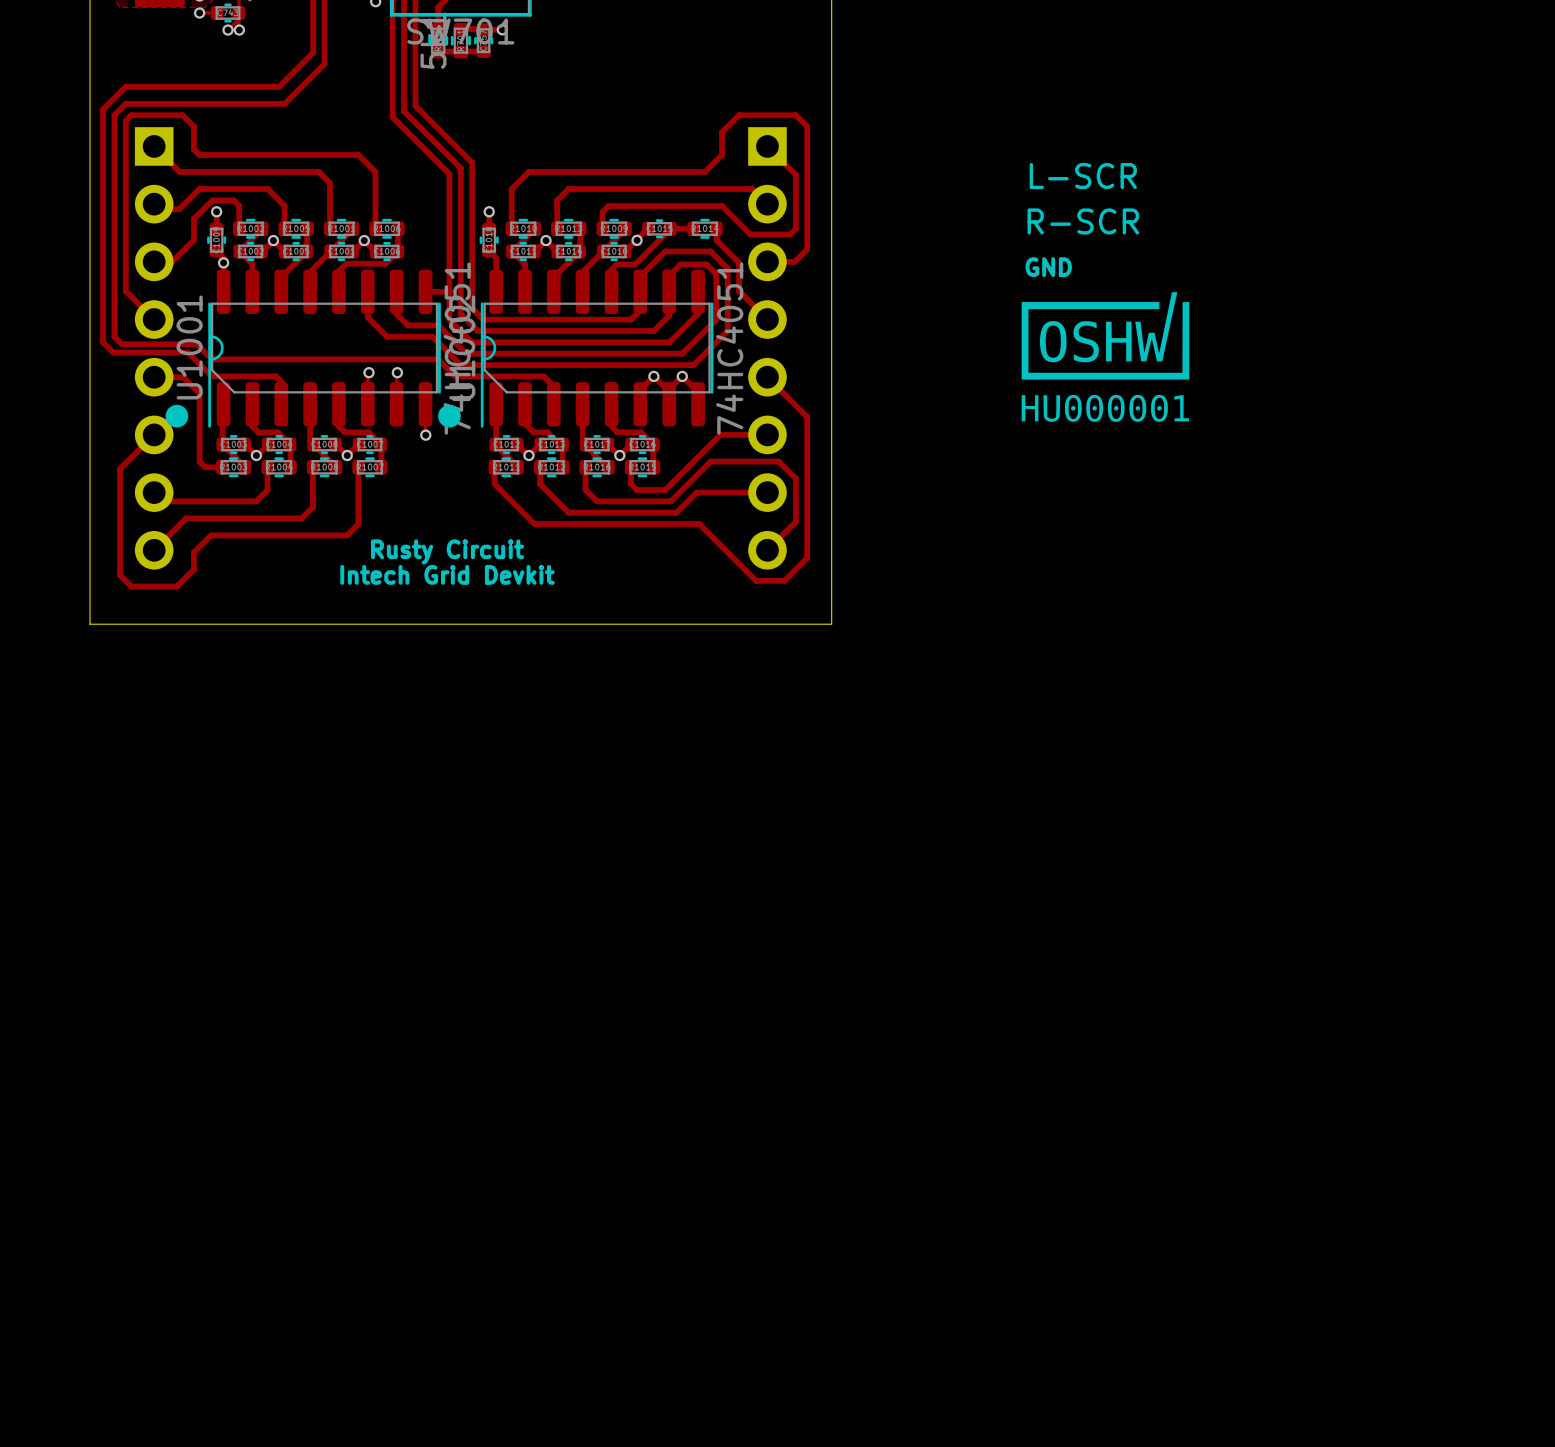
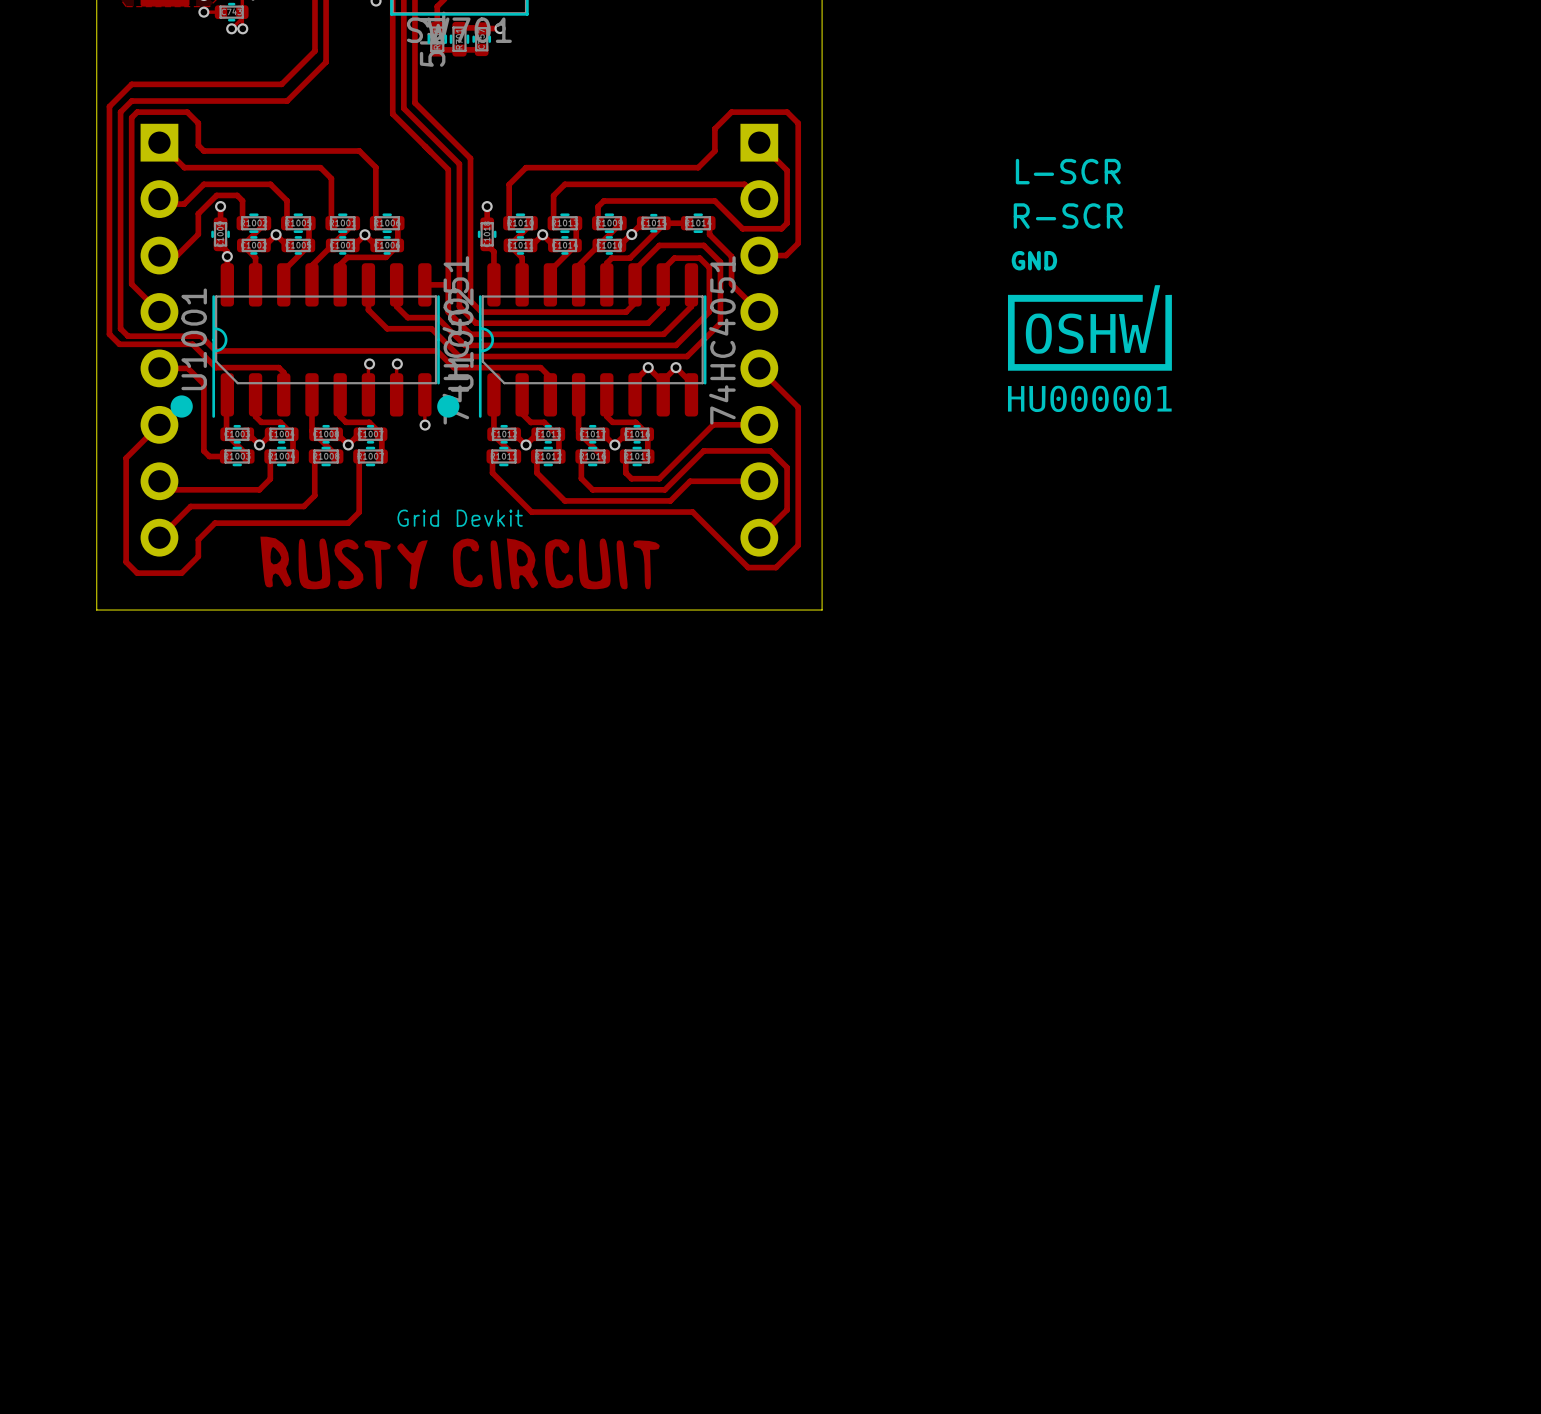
text: none -> Grid Devkit (460, 518)
drawing: none -> [260, 536, 660, 590]
text: Rusty Circuit (447, 551) -> none
text: Intech Grid Devkit (447, 574) -> none

